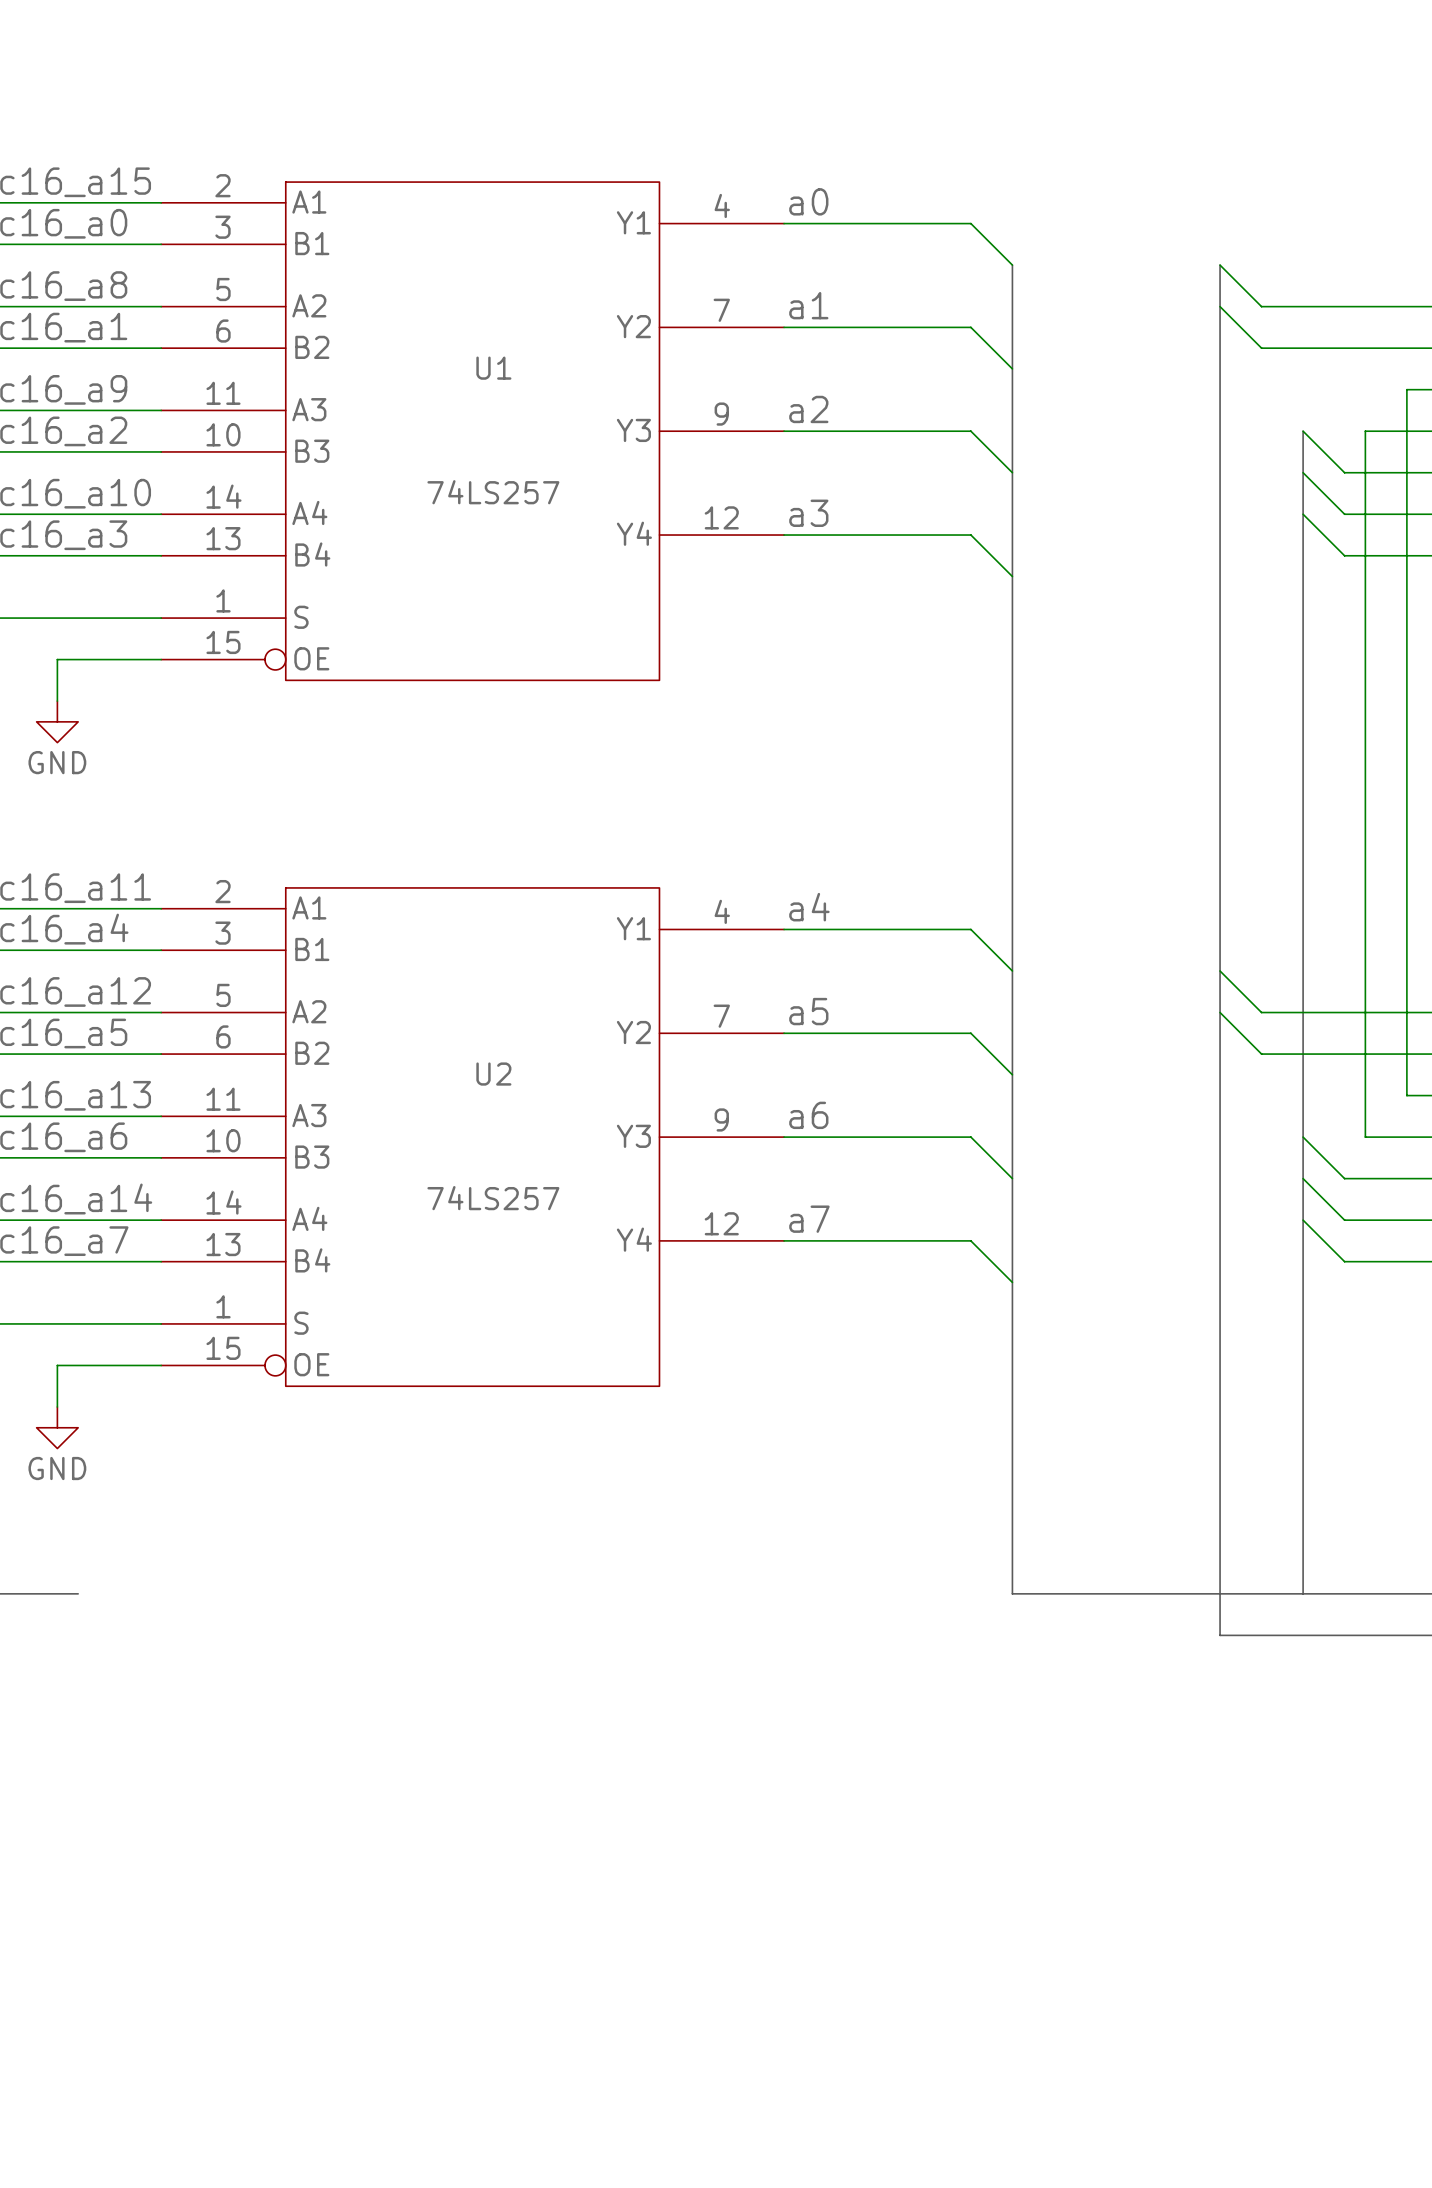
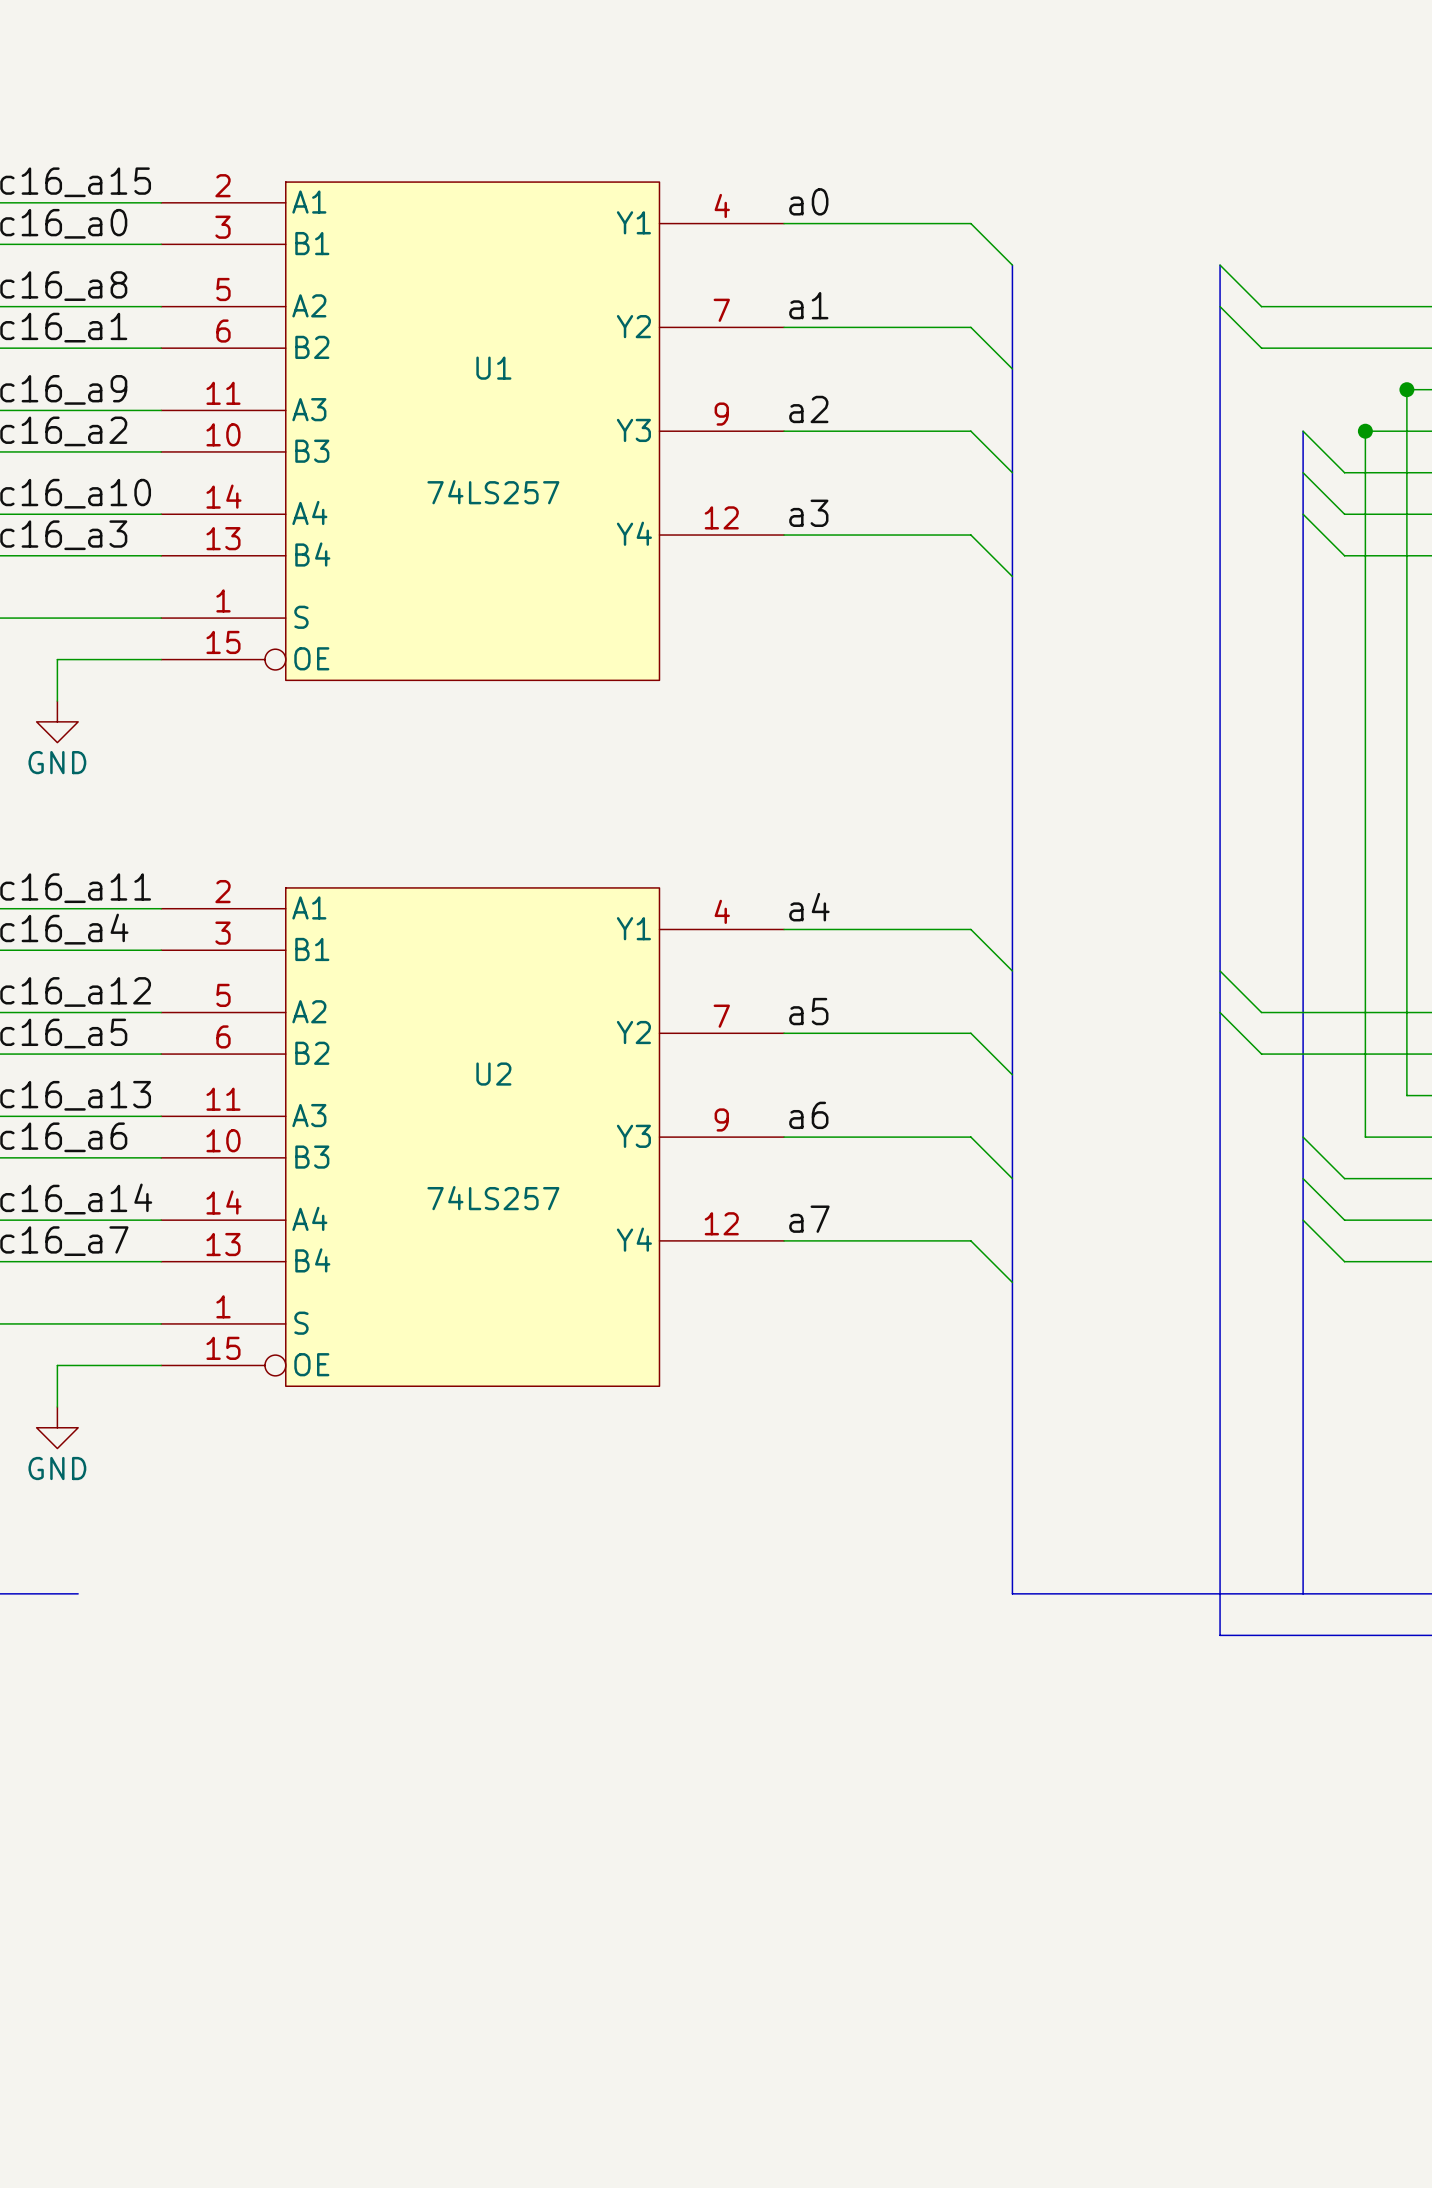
junction: none -> (1406, 389)
junction: none -> (1365, 431)

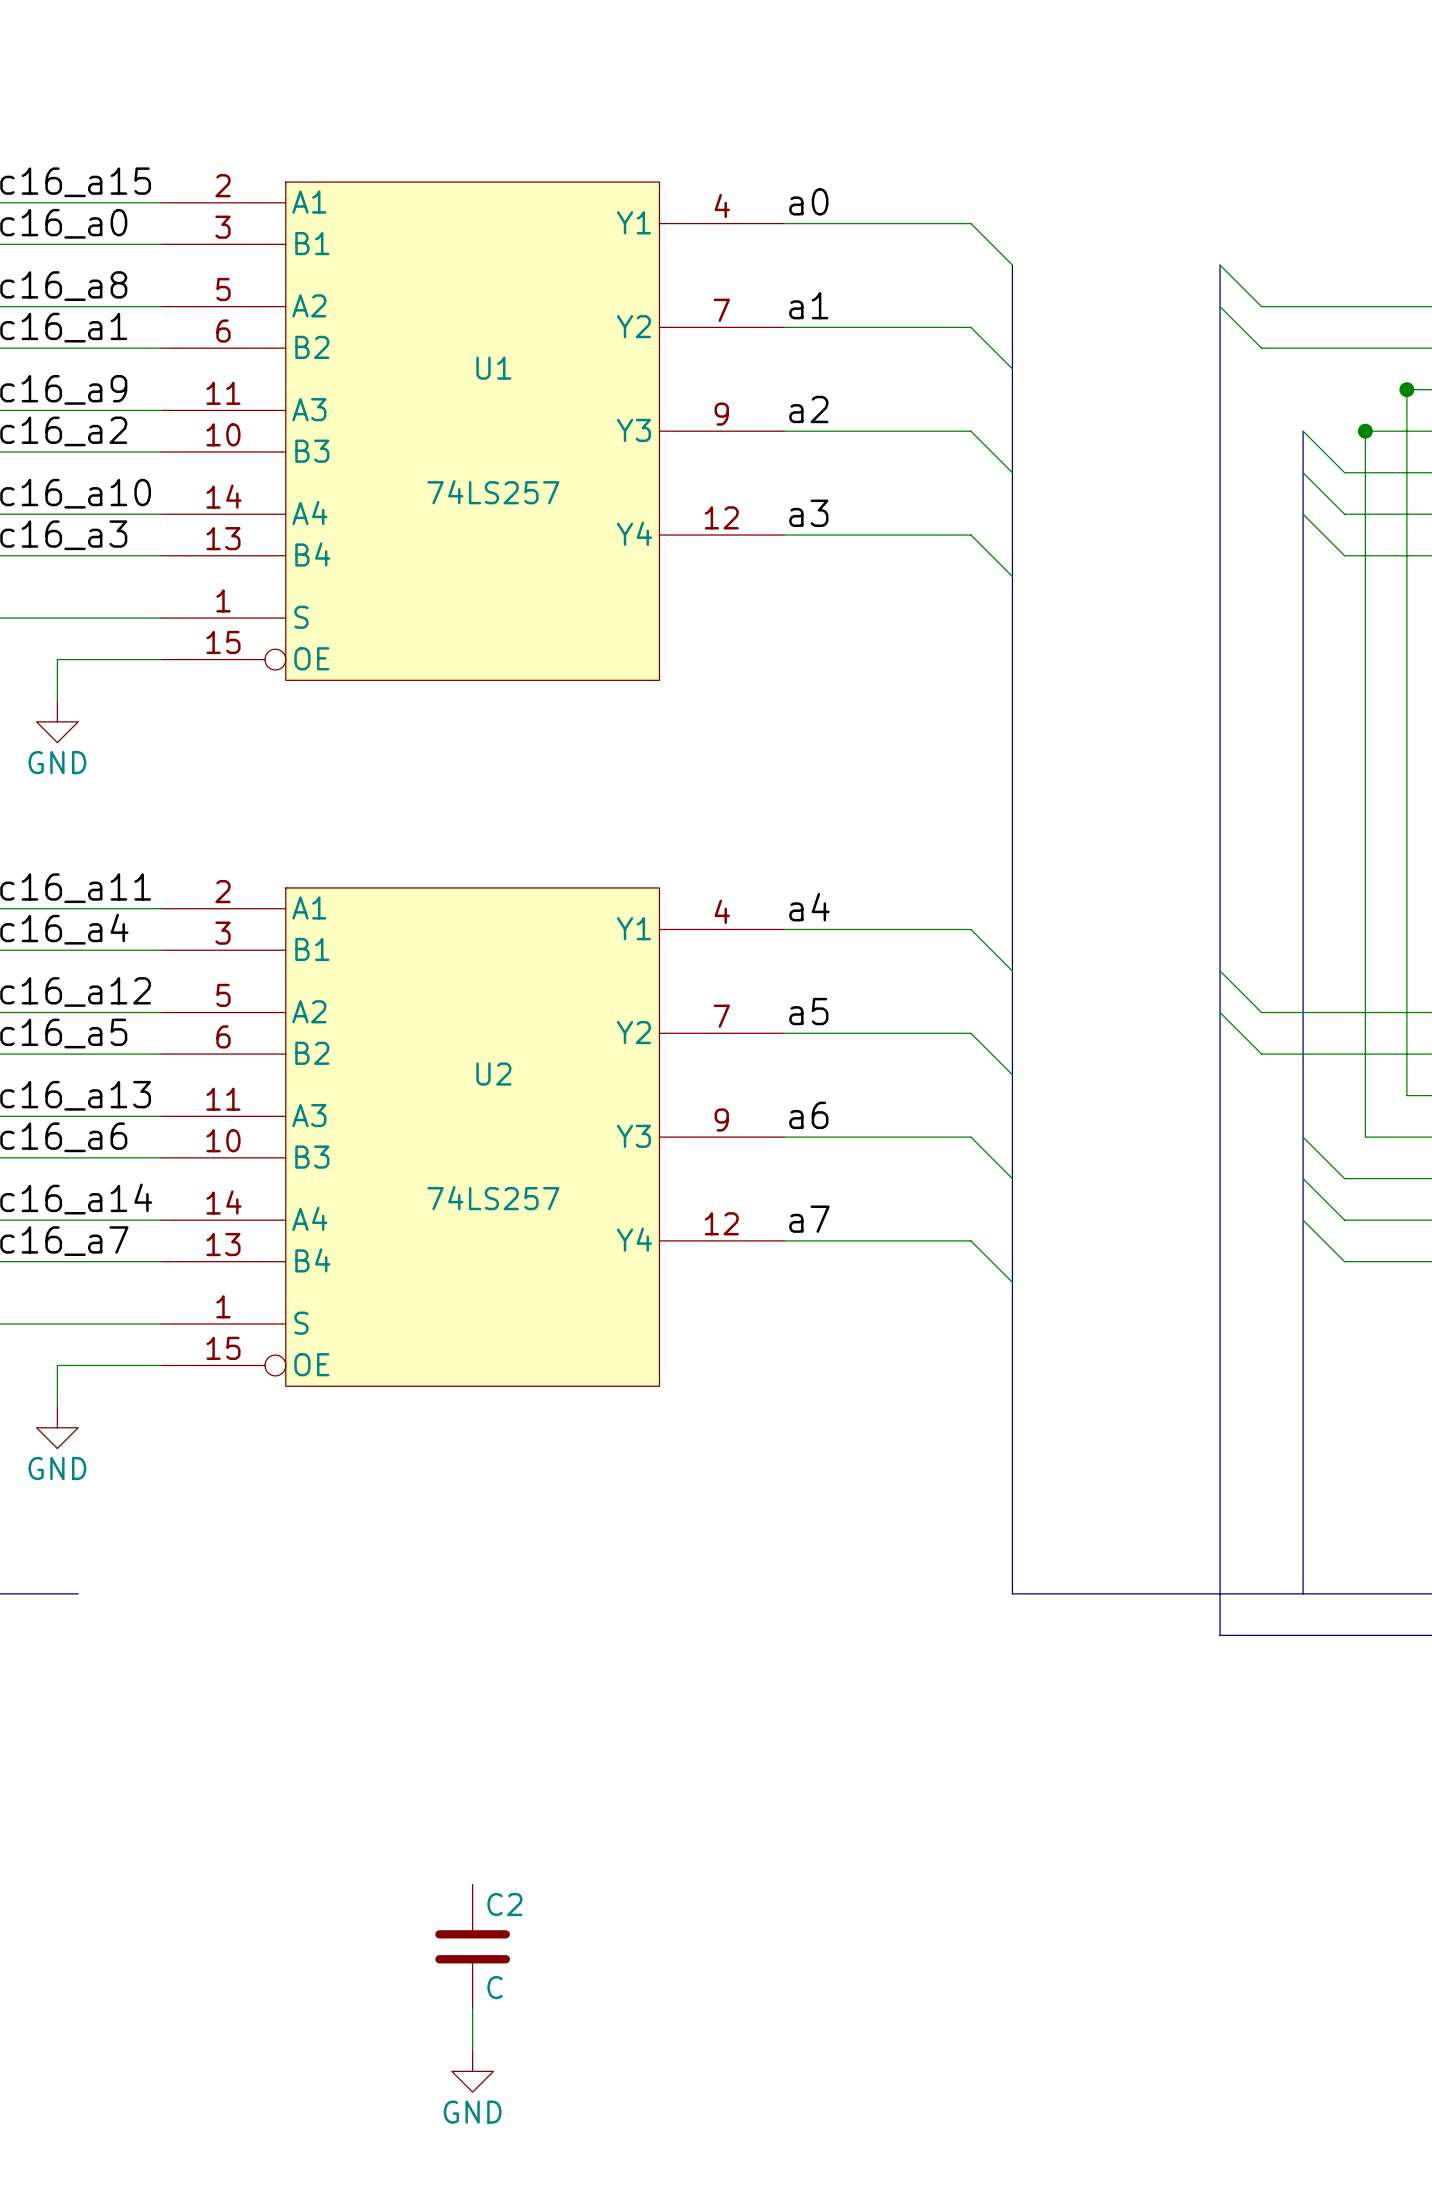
C2: none -> C (472, 1946)
wire: none -> (472, 2009) (472, 2050)
power symbol: none -> GND (472, 2071)

